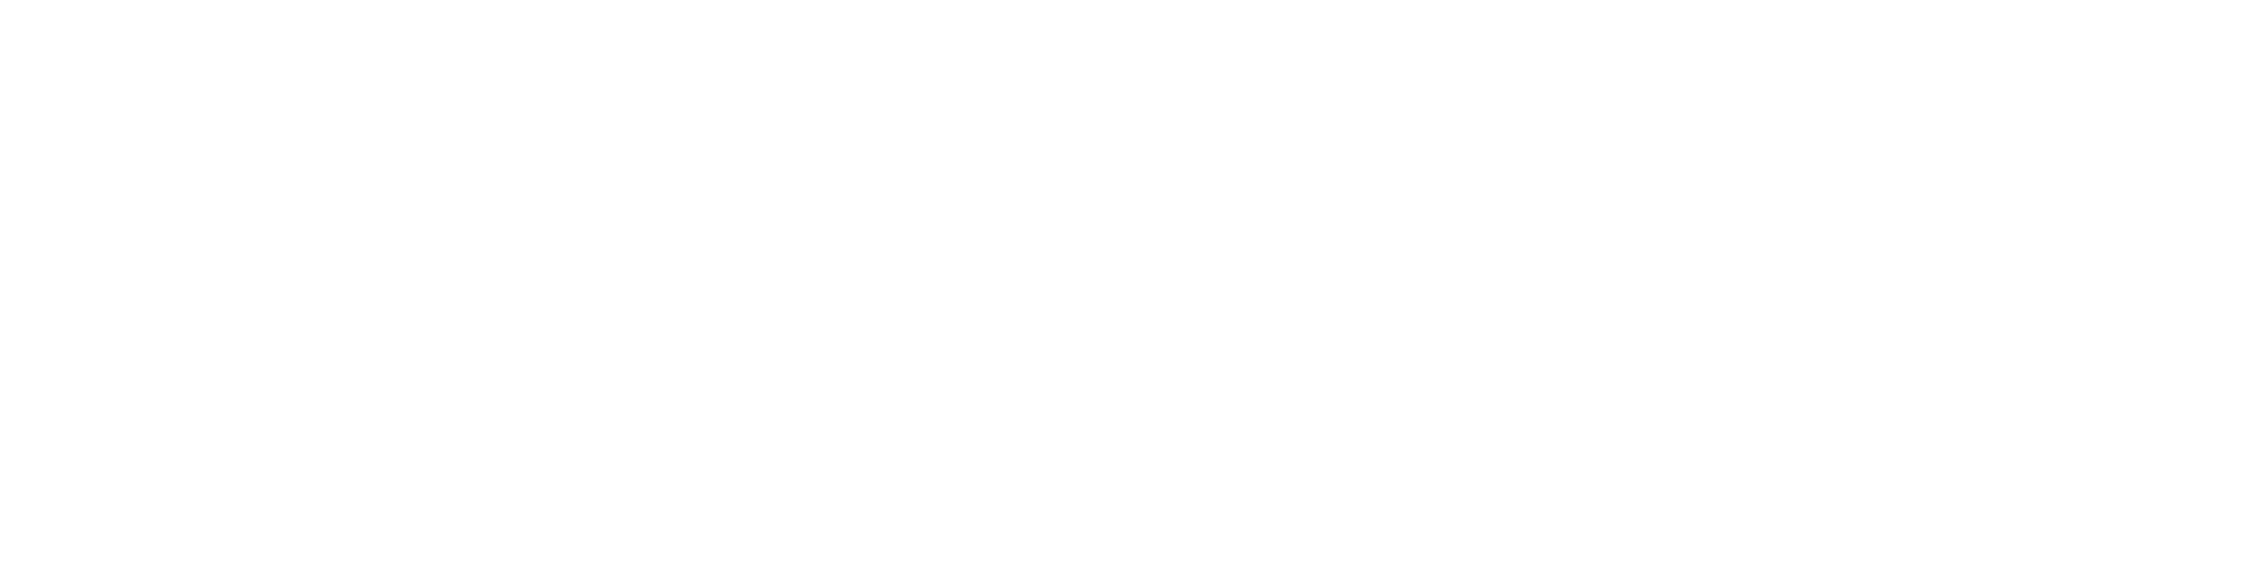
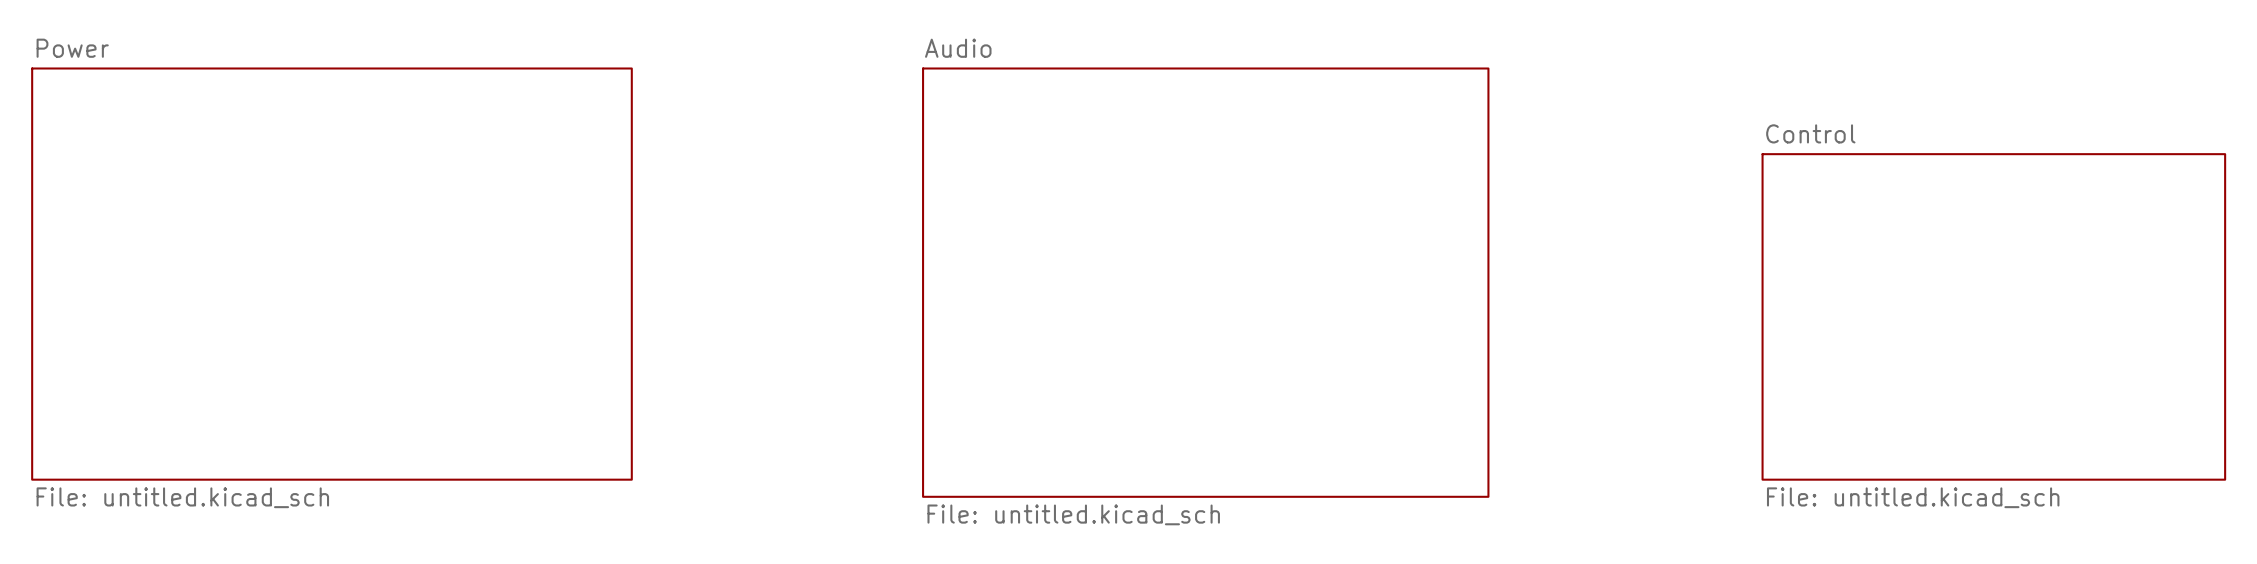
sheet Power: none -> File: untitled.kicad_sch (331, 274)
sheet Audio: none -> File: untitled.kicad_sch (1205, 282)
sheet Control: none -> File: untitled.kicad_sch (1993, 316)

